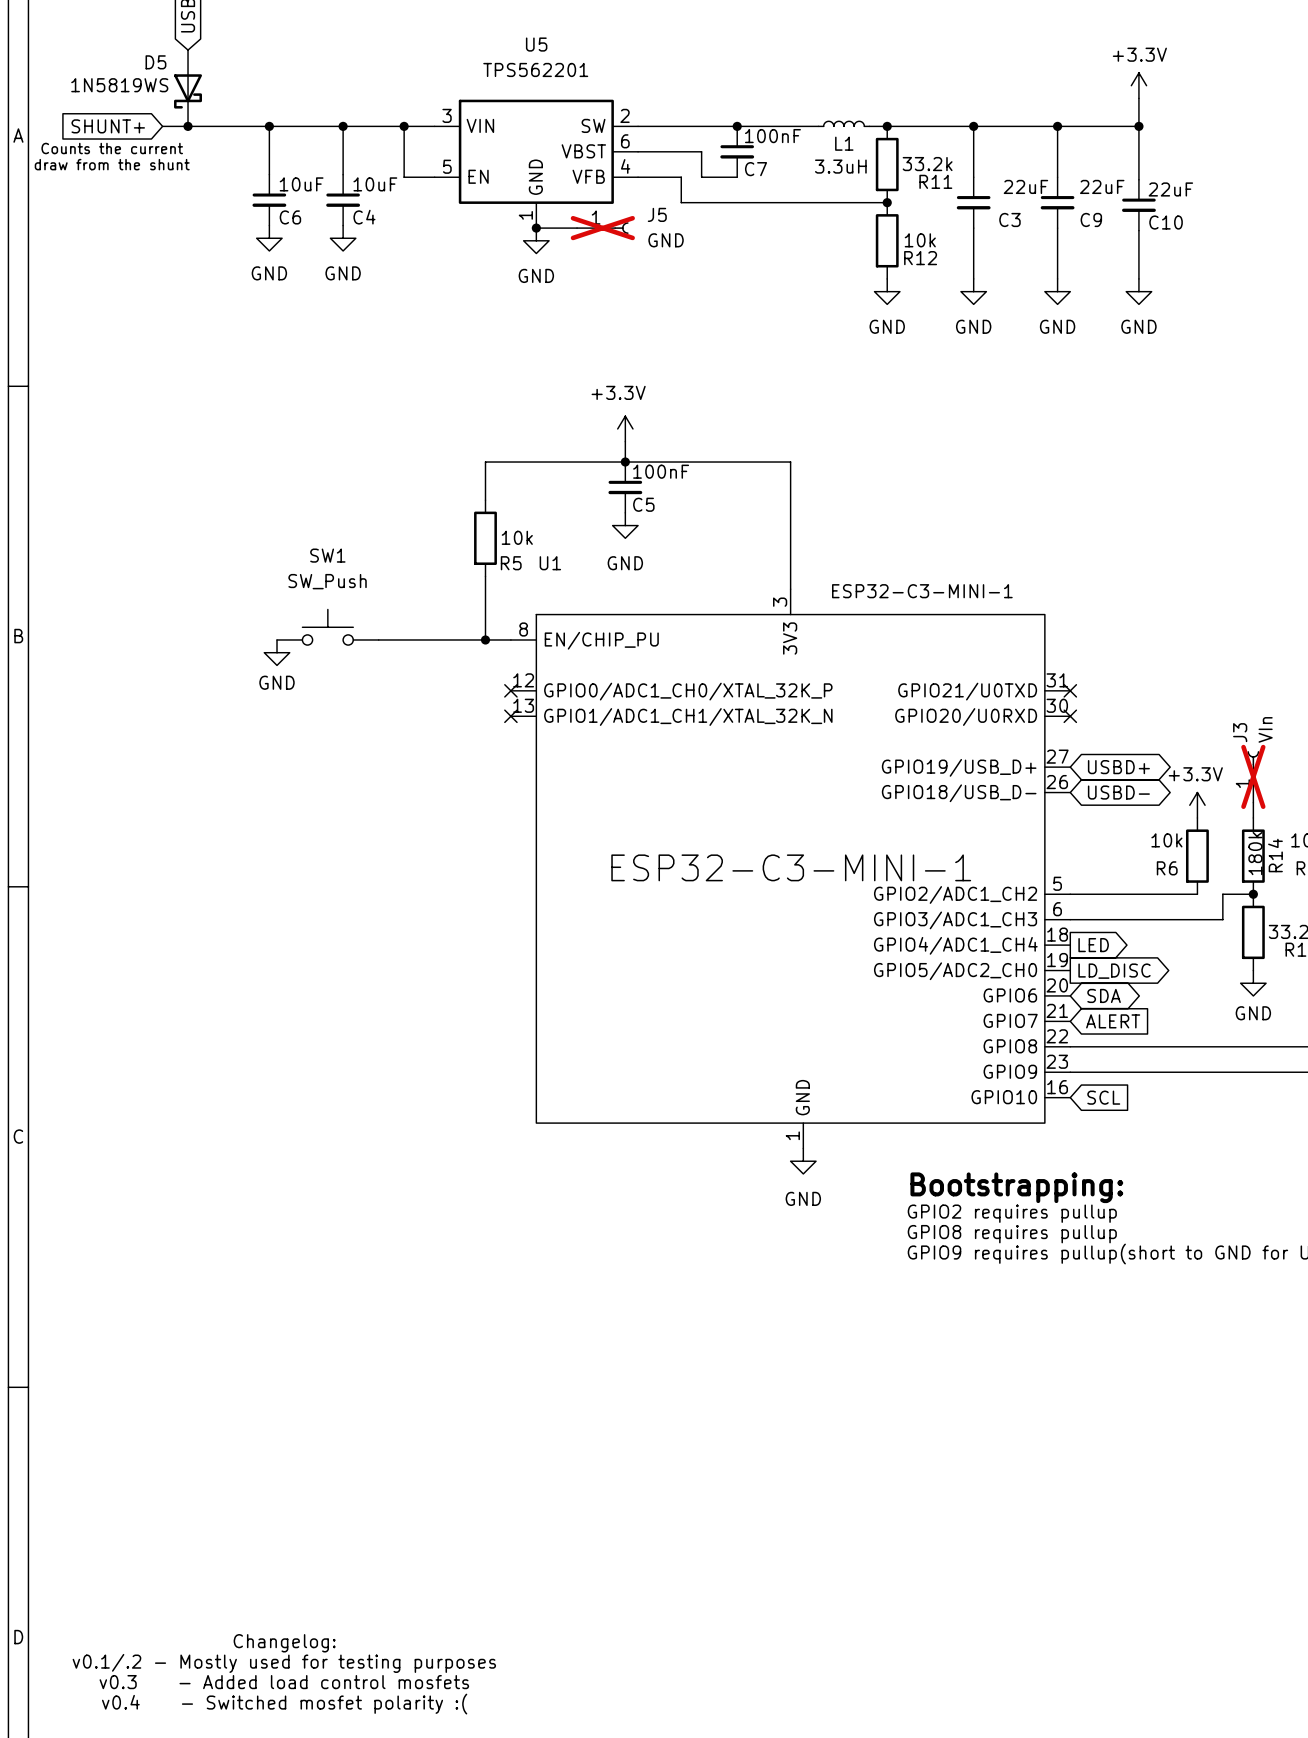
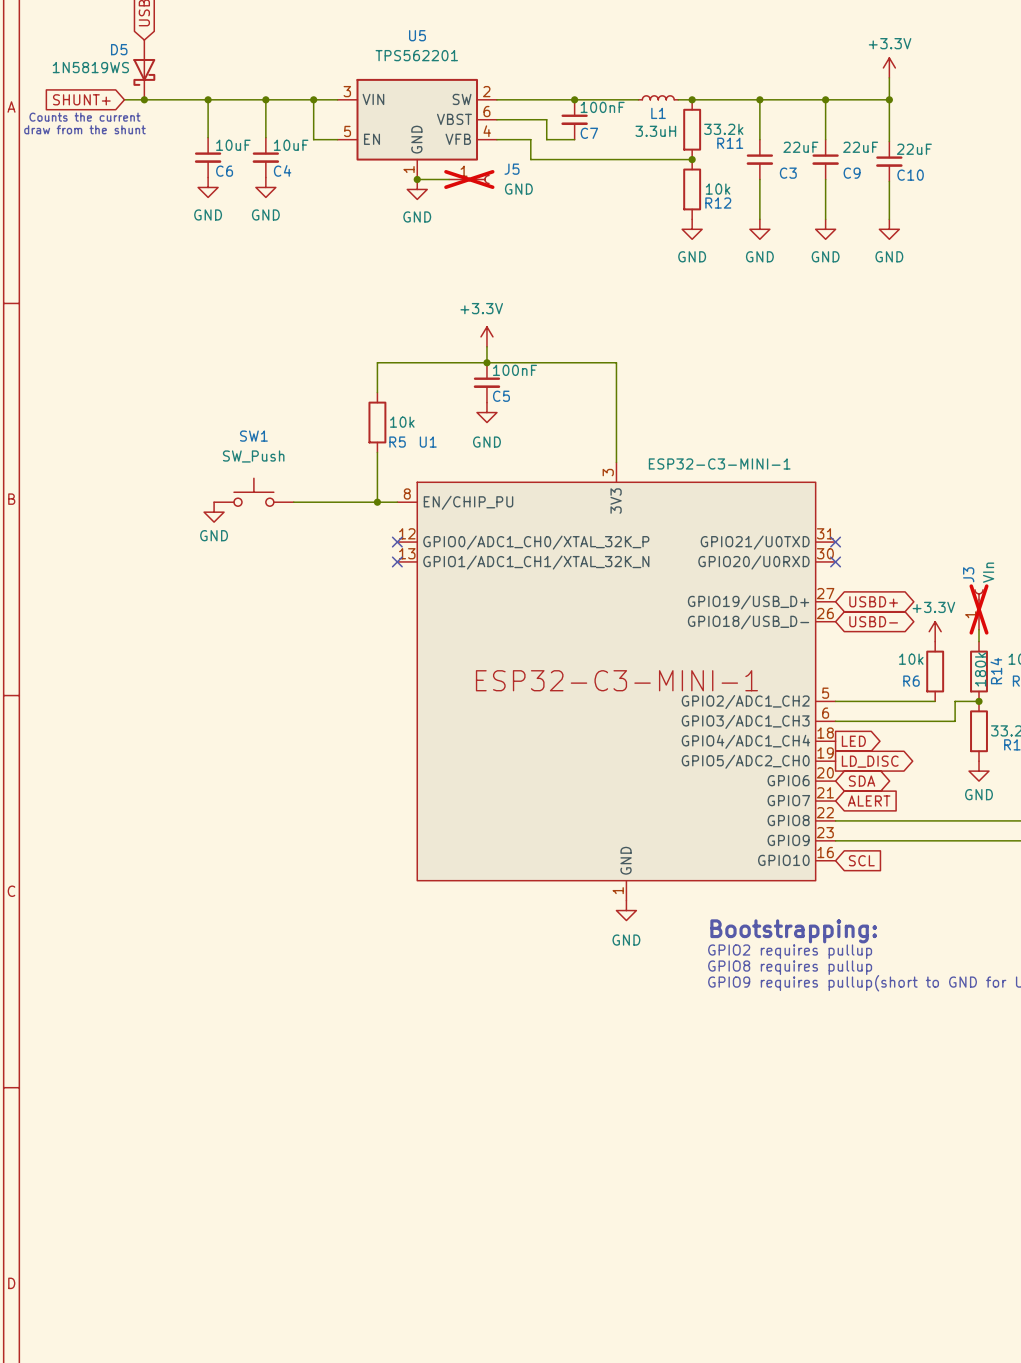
text: Changelog: (284, 1643) -> none
text: v0.1/.2 - Mostly used for testing purposes (284, 1663) -> none
text: v0.3 - Added load control mosfets (284, 1682) -> none
text: v0.4 - Switched mosfet polarity :( (284, 1704) -> none

